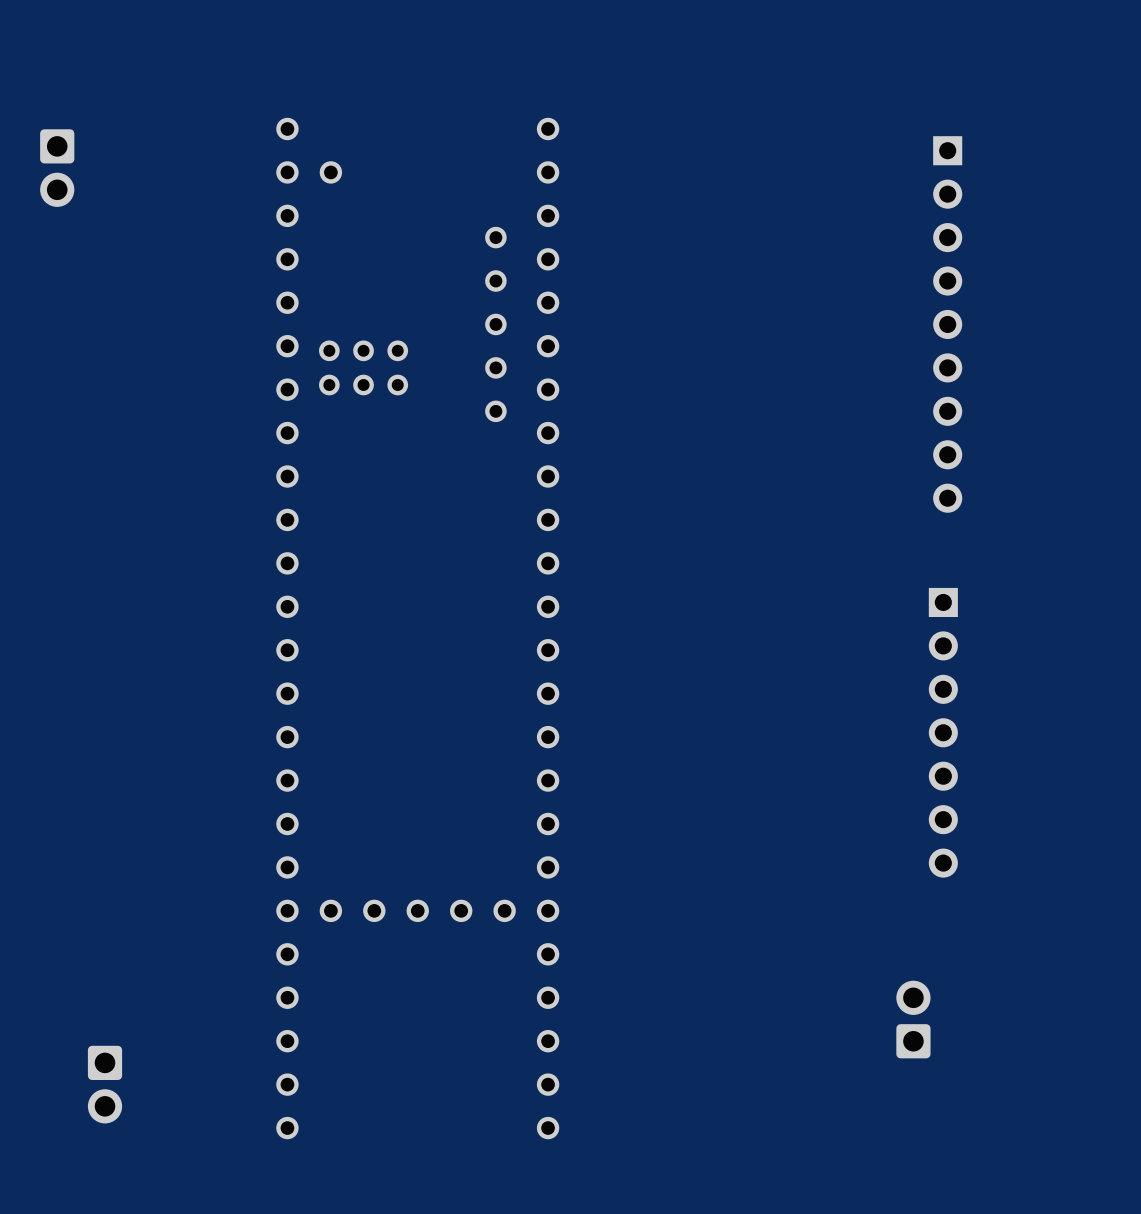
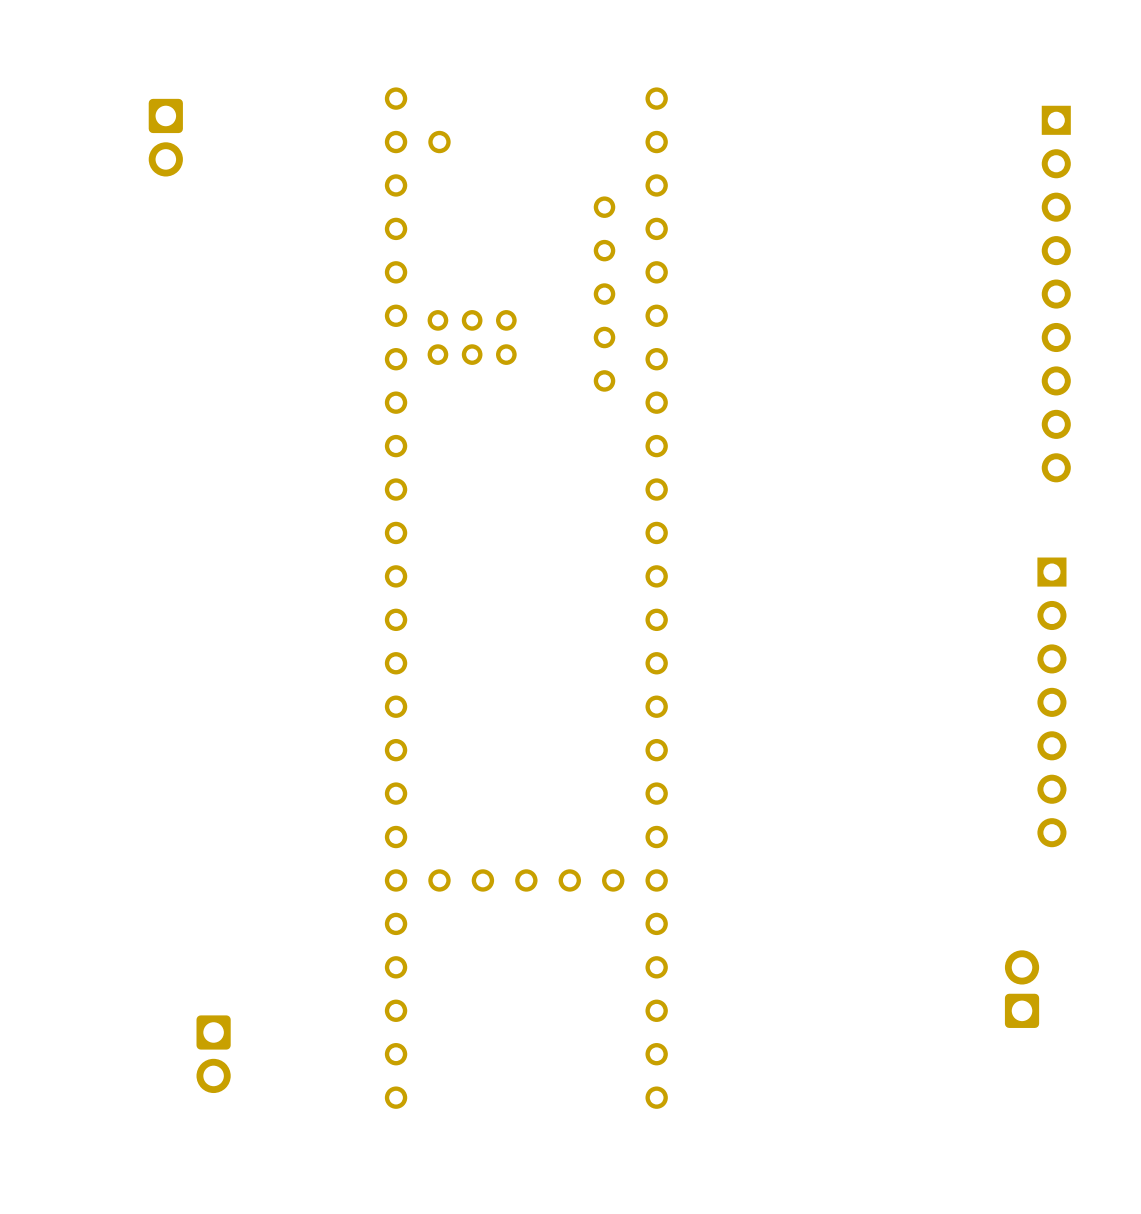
part position: (57, 168) -> (165, 137)
part position: (947, 324) -> (1056, 294)
part position: (417, 628) -> (526, 598)
part position: (943, 732) -> (1051, 702)
part position: (913, 1019) -> (1022, 989)
part position: (105, 1084) -> (213, 1054)

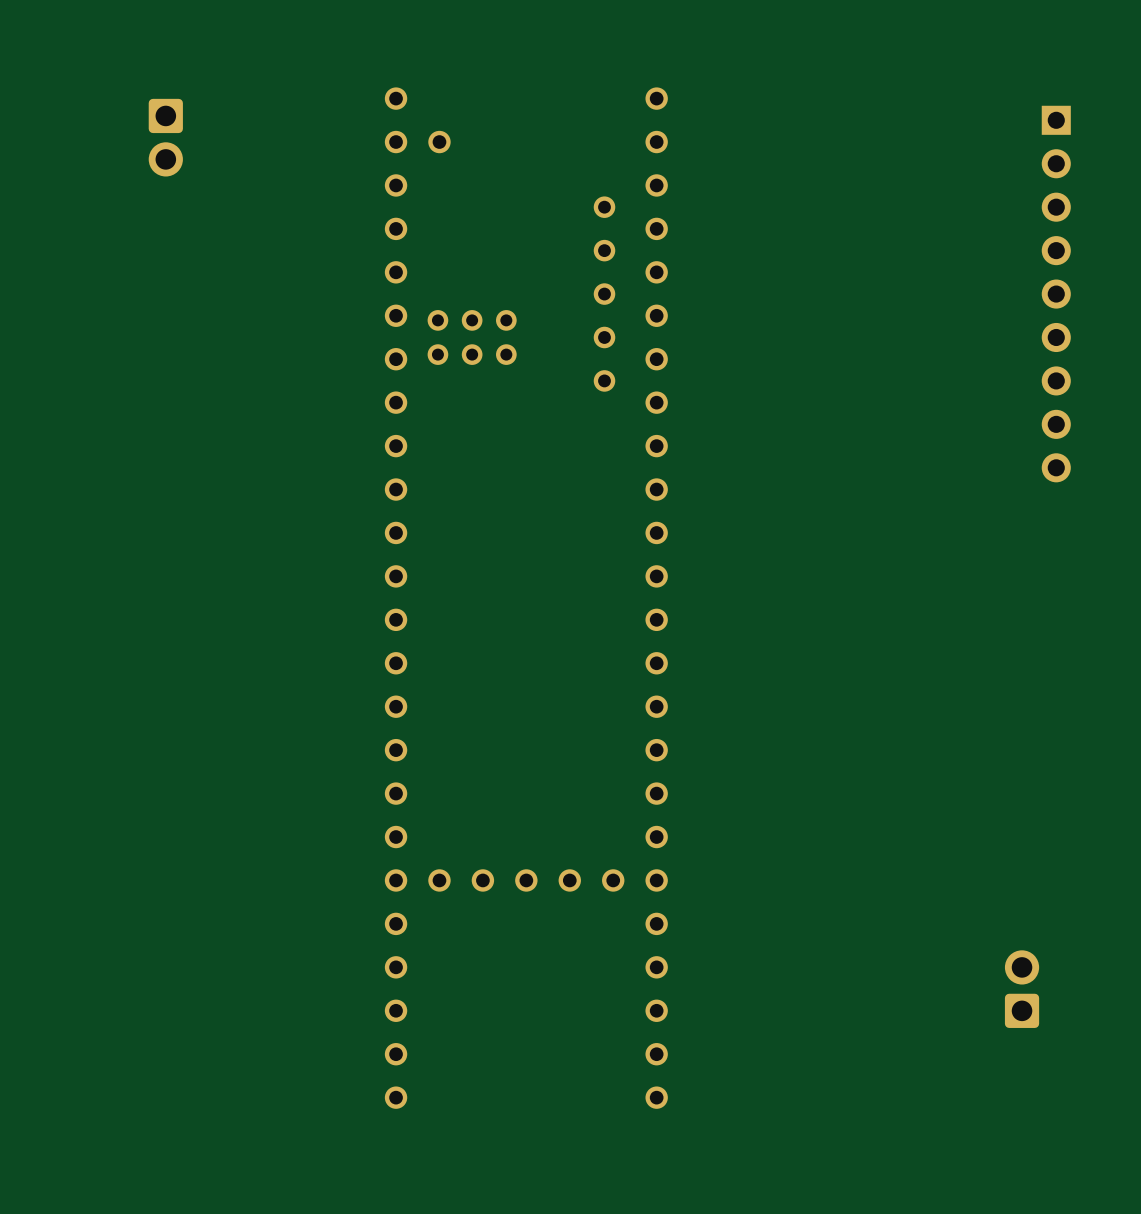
part: (1051, 702) -> none
part: (213, 1054) -> none

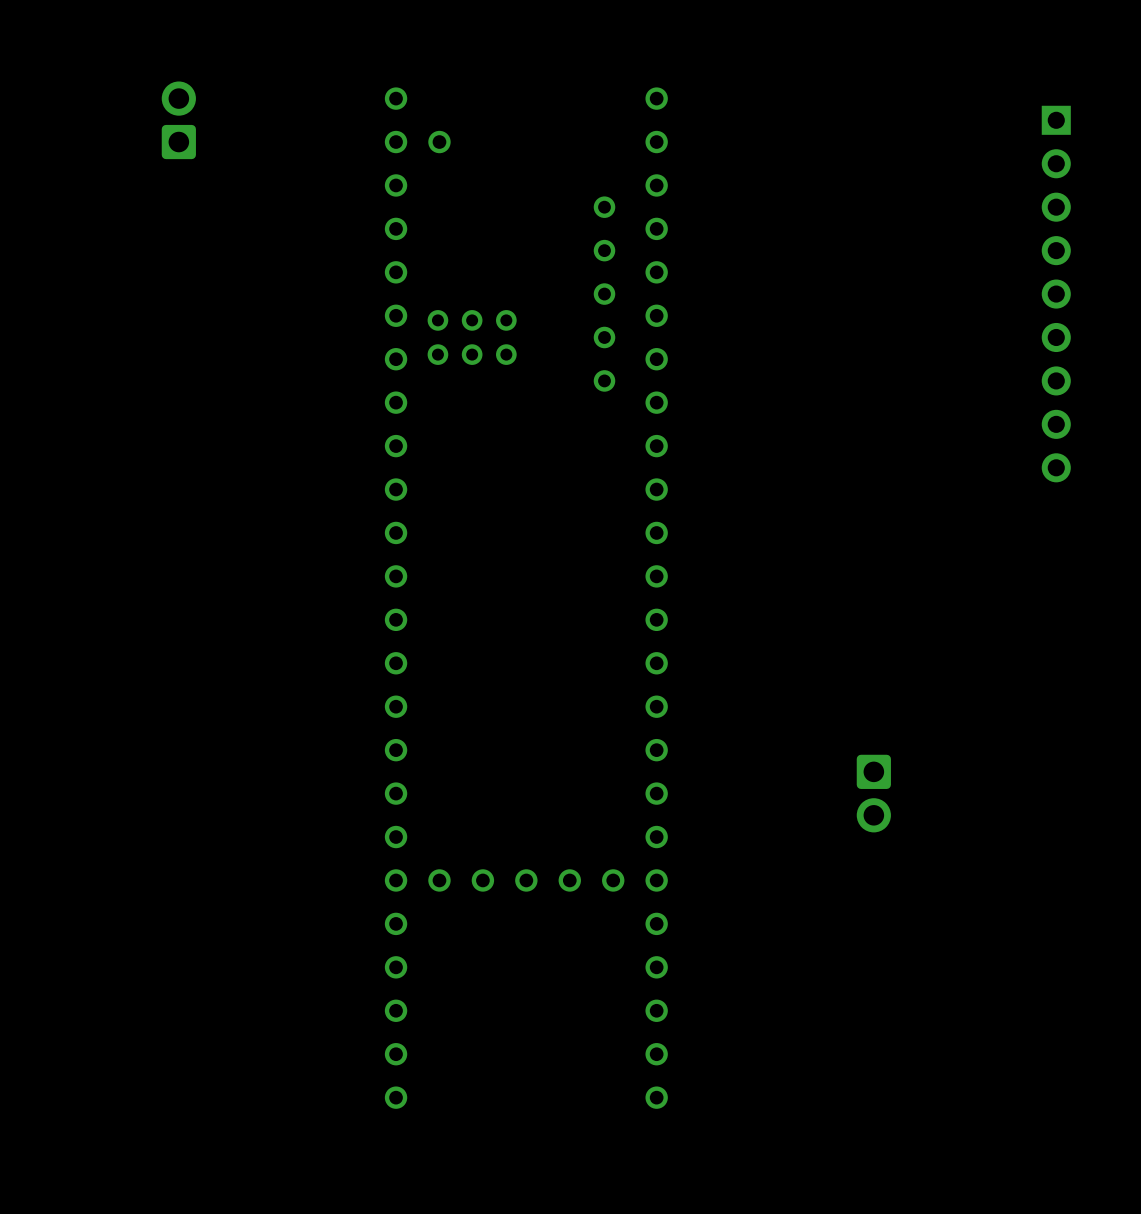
part rotation: 0° (165, 137) -> 180° (178, 120)
part rotation: 0° (1022, 989) -> 180° (873, 793)
part position: (1022, 989) -> (873, 793)

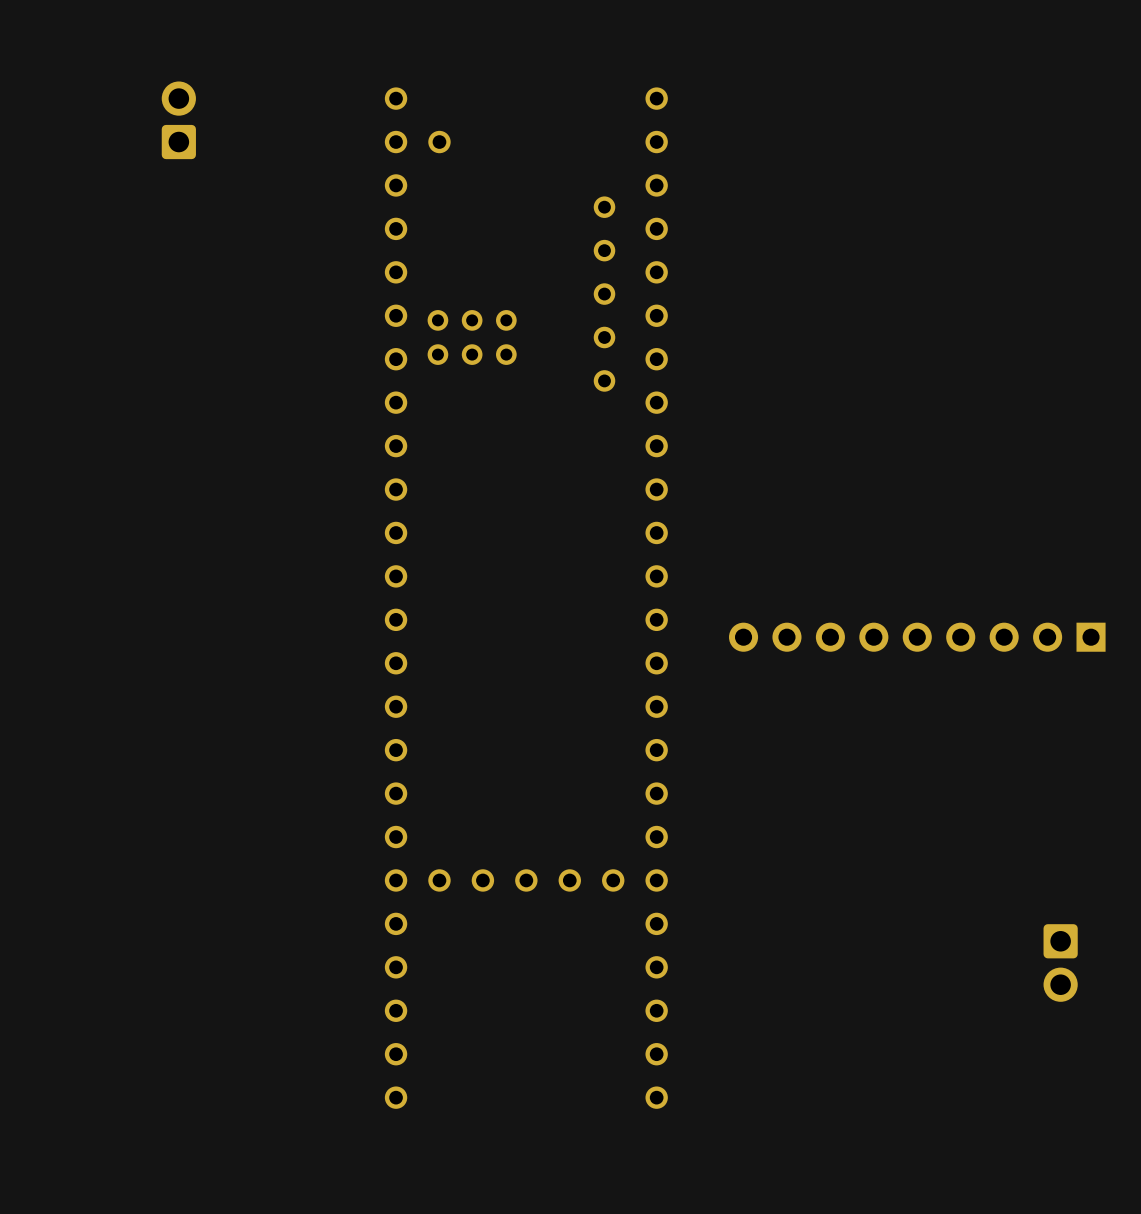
part rotation: 0° (1056, 294) -> 90° clockwise (917, 637)
part position: (1056, 294) -> (917, 637)
part position: (873, 793) -> (1060, 962)

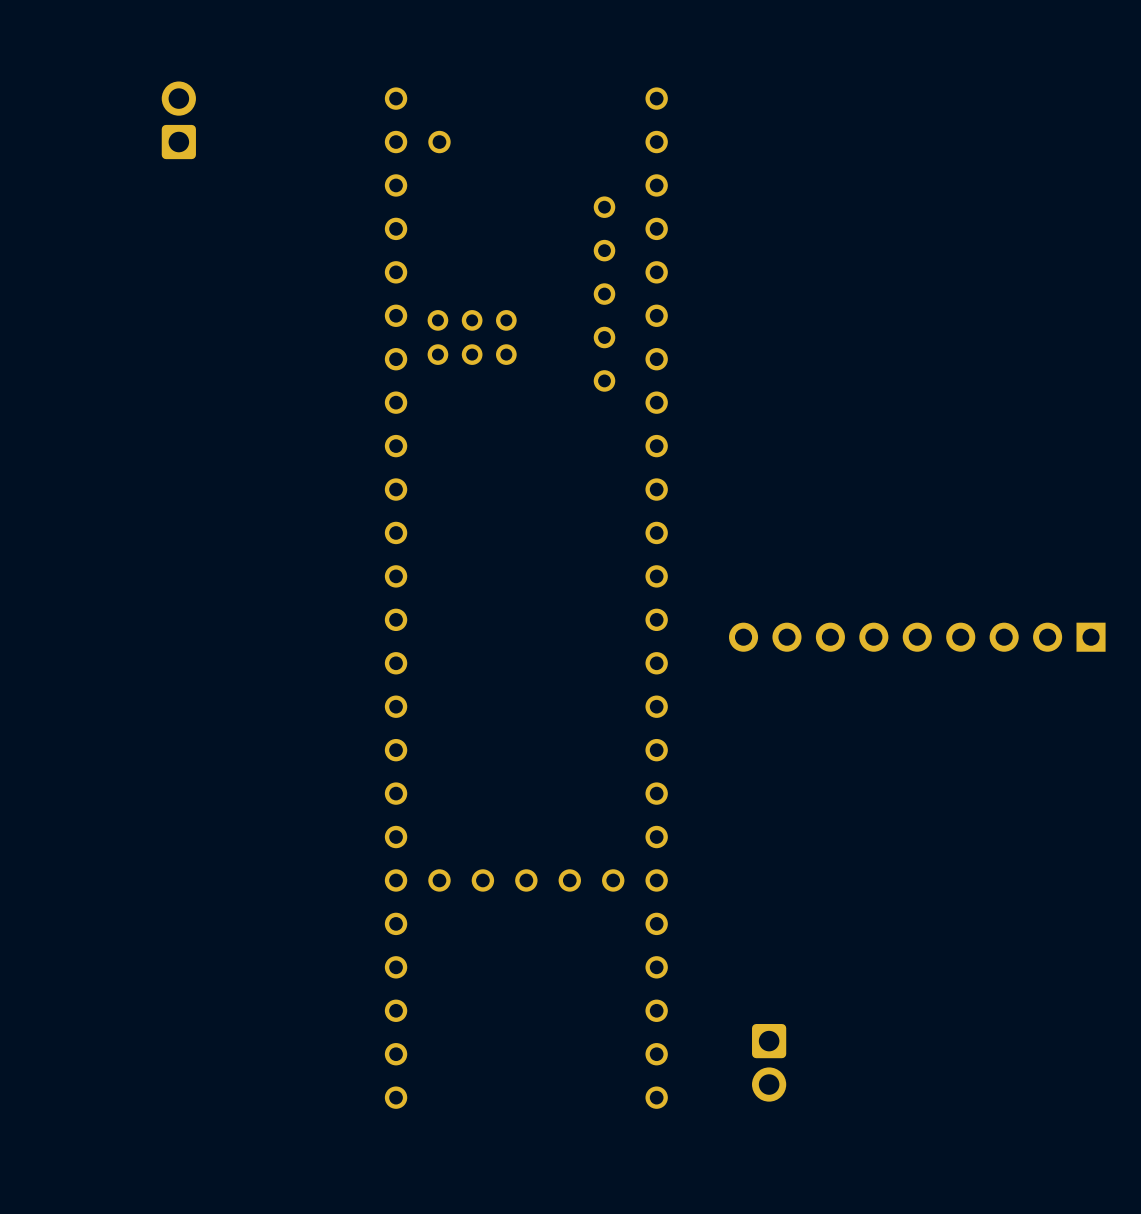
part position: (1060, 962) -> (769, 1062)

